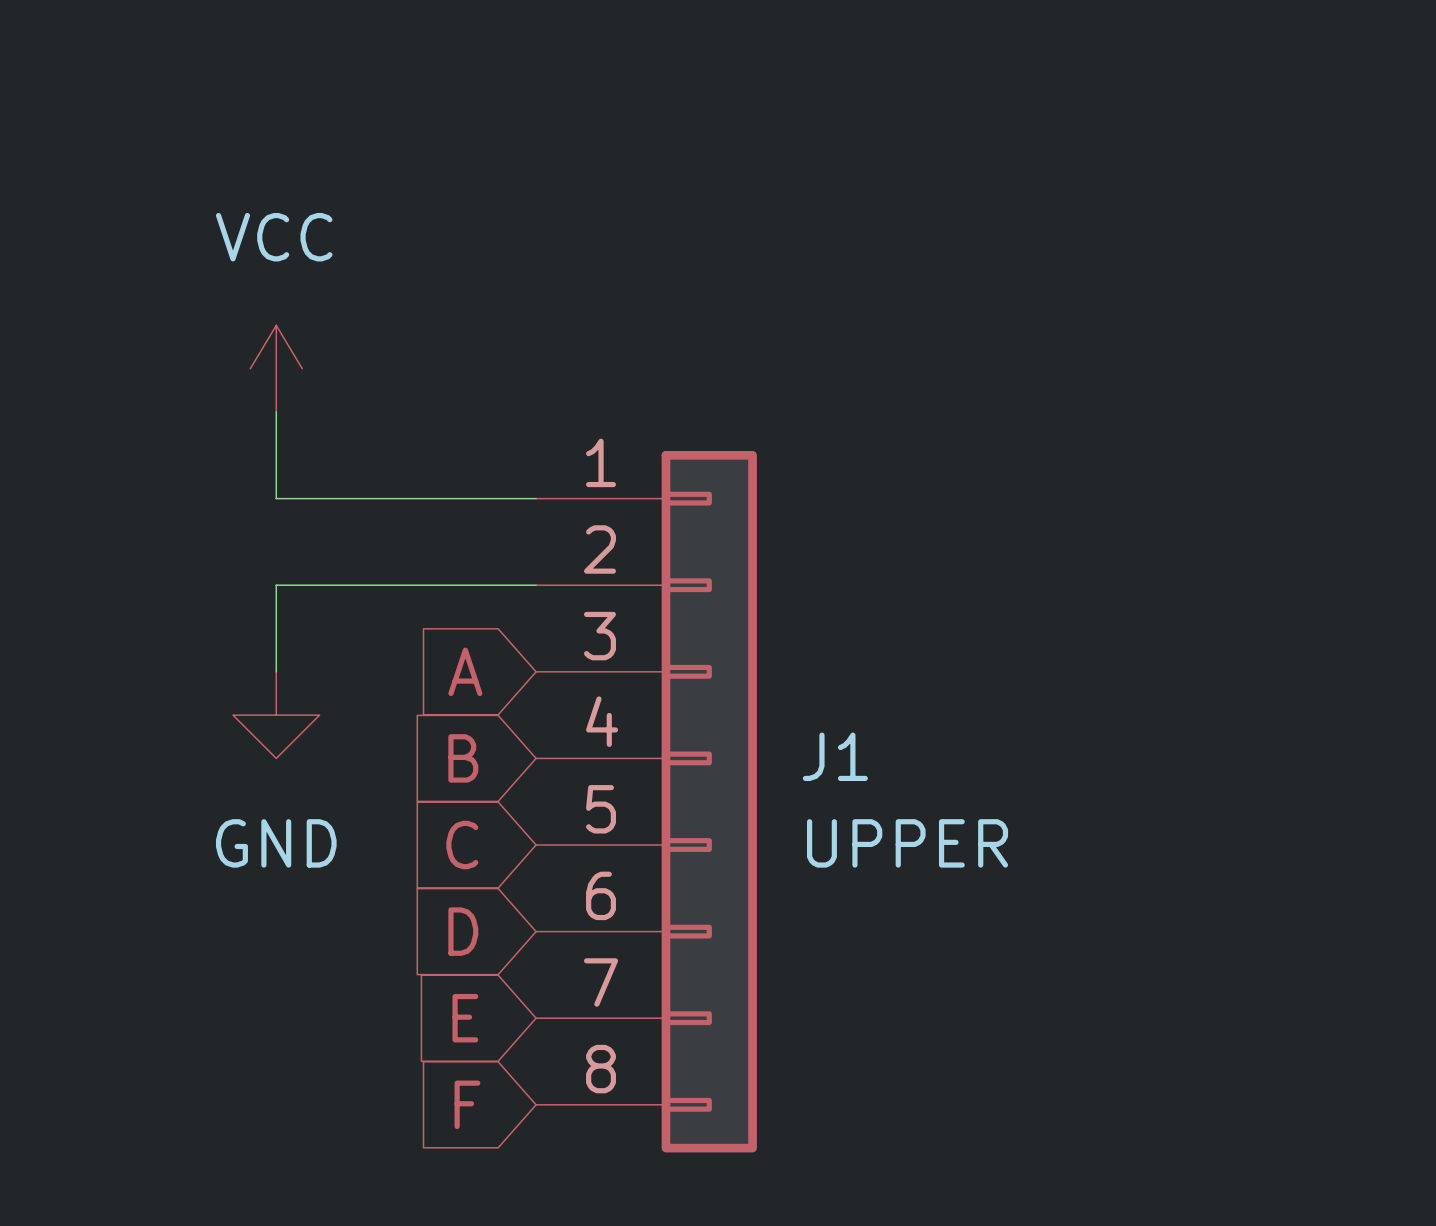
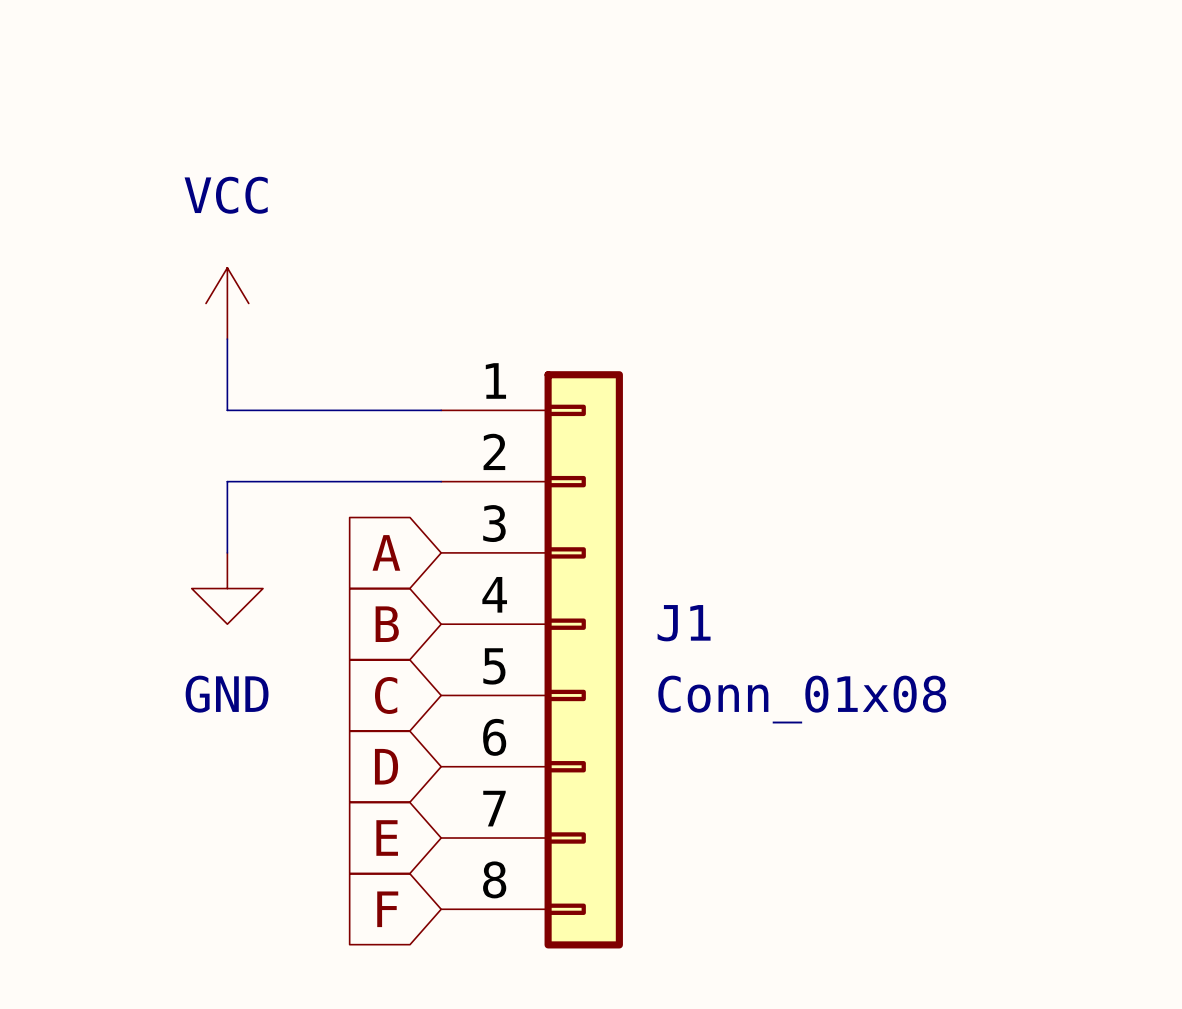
J1 value: UPPER (907, 843) -> Conn_01x08 (802, 699)

